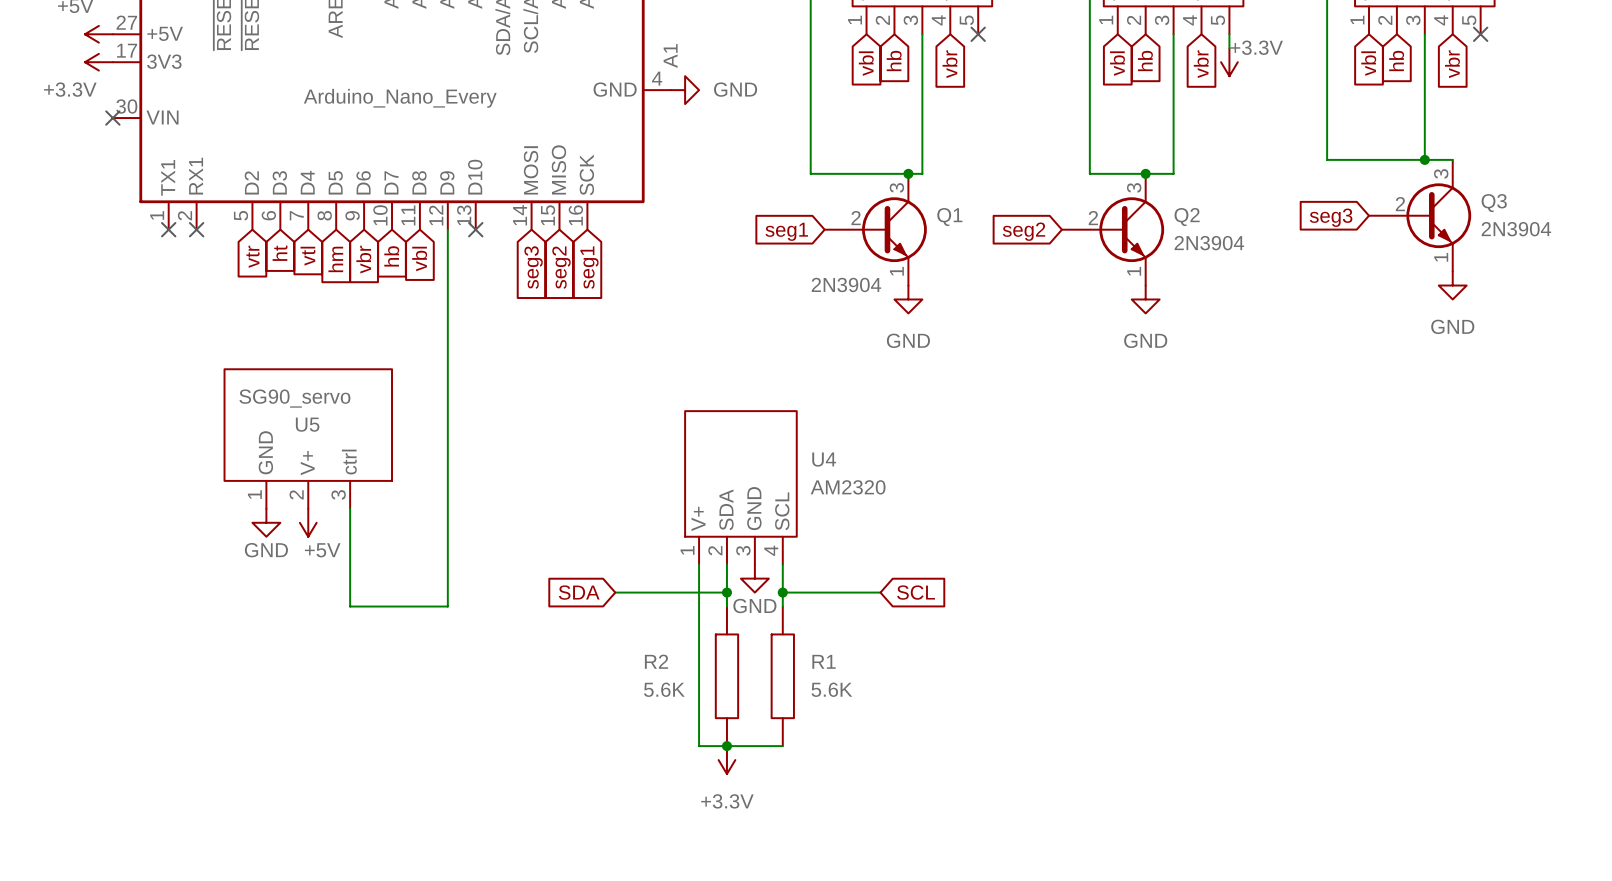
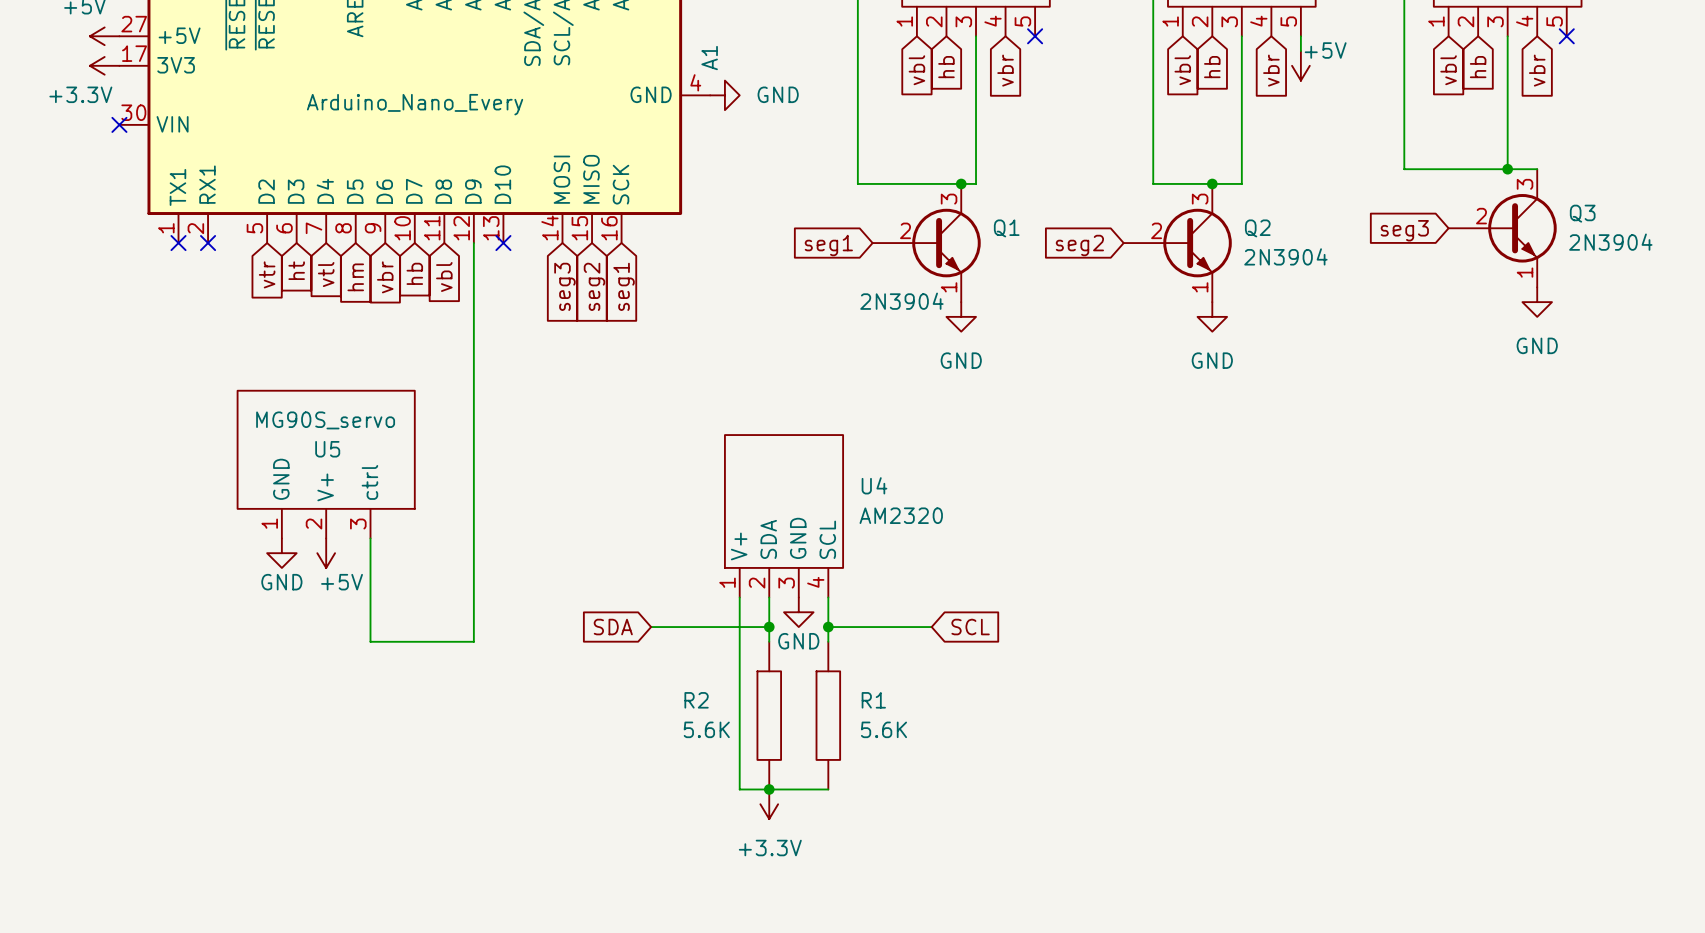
power symbol: +3.3V (1229, 62) -> +5V (1300, 65)
U5 value: SG90_servo (294, 398) -> MG90S_servo (325, 420)

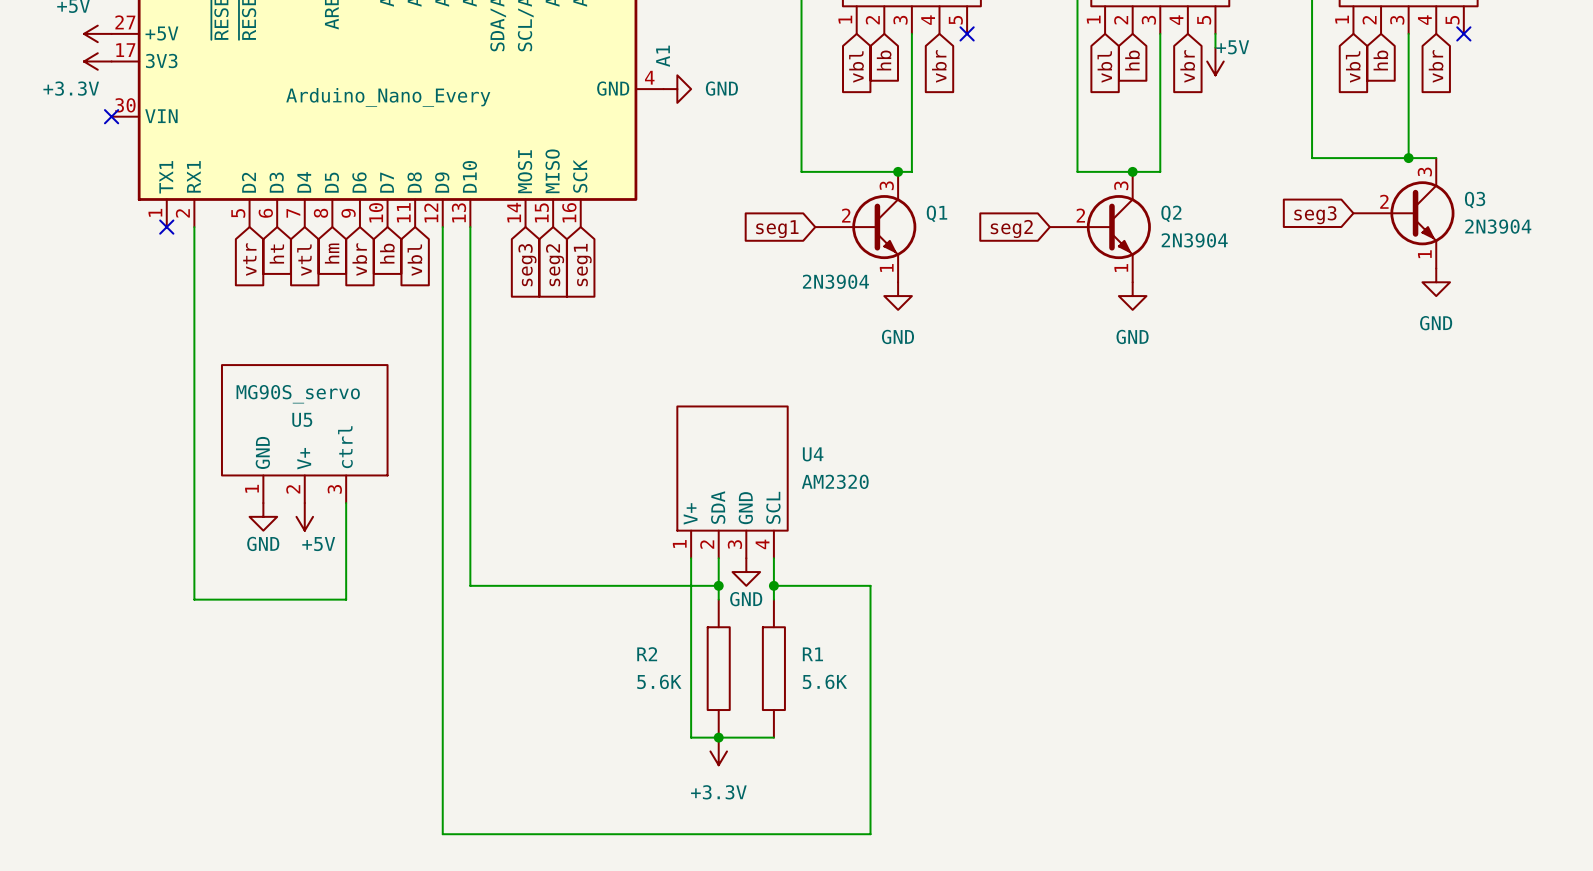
no-connect mark: (208, 243) -> none
wire: none -> (470, 227) (470, 585) (608, 585)
no-connect mark: (503, 243) -> none
global label: SDA (613, 627) -> none
wire: none -> (870, 585) (870, 834) (442, 834) (442, 599)
global label: SCL (970, 627) -> none
wire: (370, 641) (473, 641) -> (346, 599) (194, 599) (194, 227)

